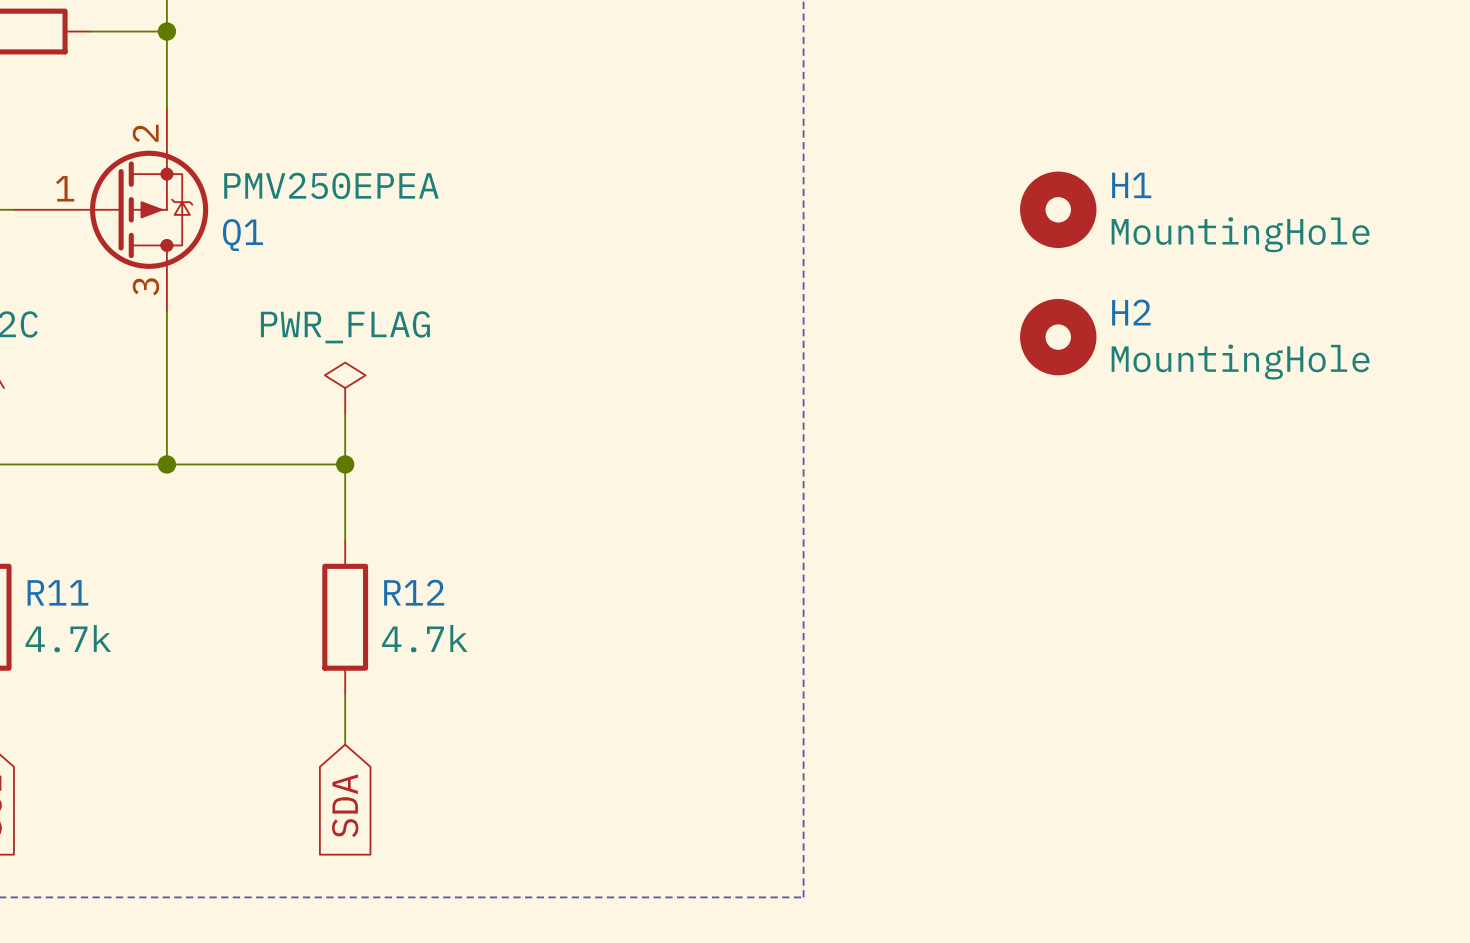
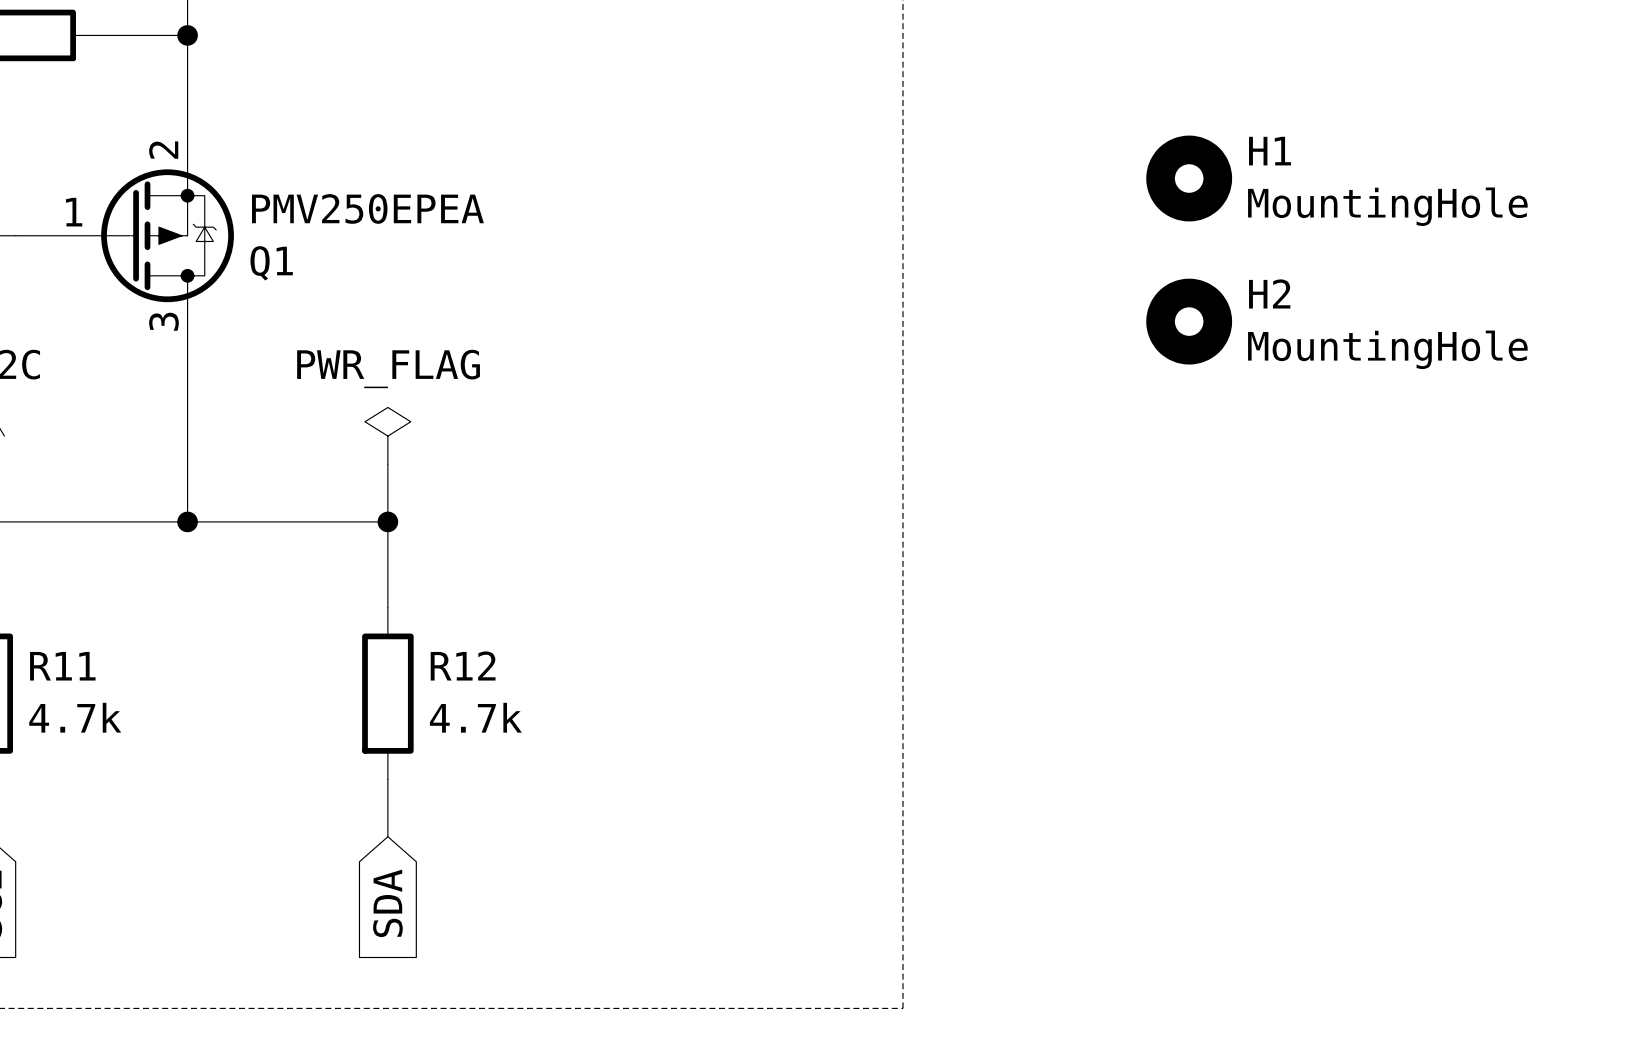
H1 position: (1058, 209) -> (1189, 178)
H2 position: (1058, 337) -> (1189, 321)

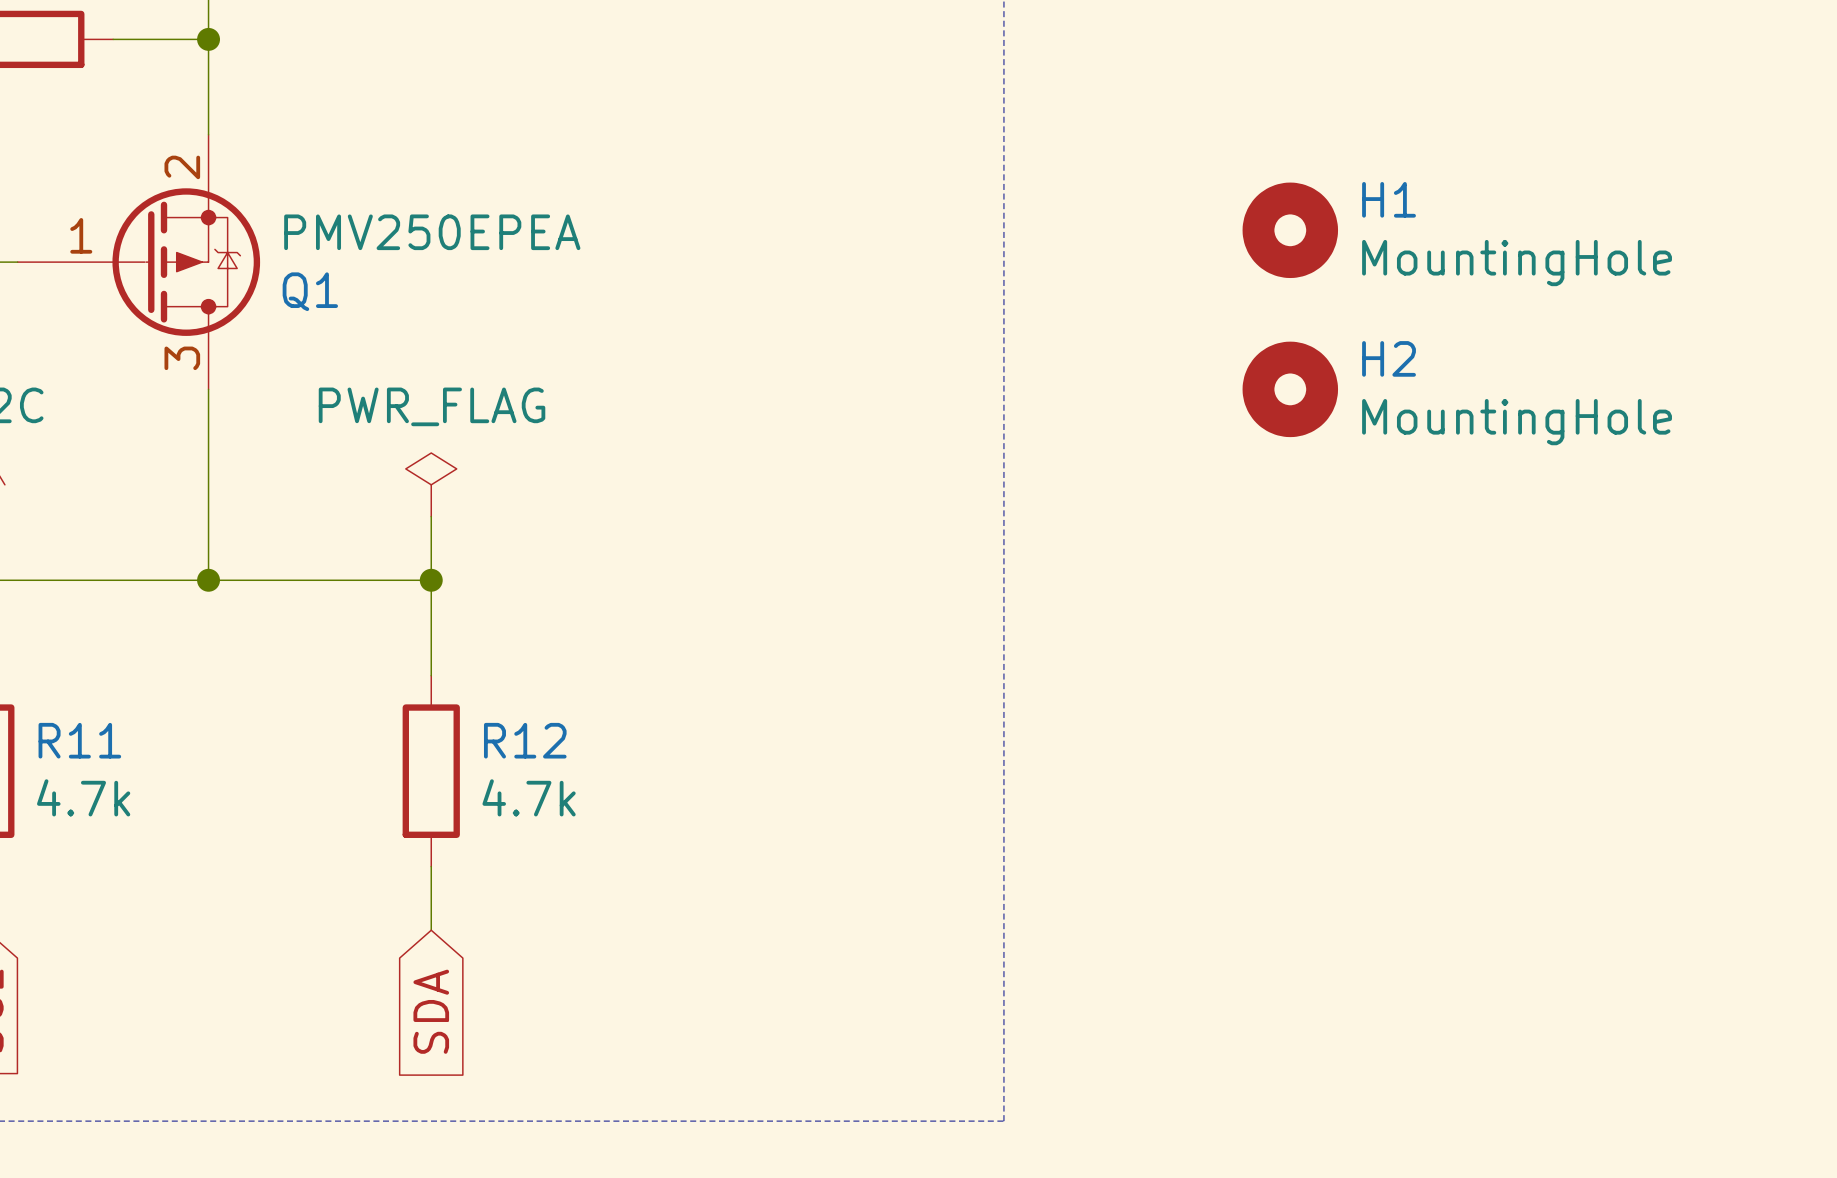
H1 position: (1189, 178) -> (1290, 230)
H2 position: (1189, 321) -> (1290, 389)

